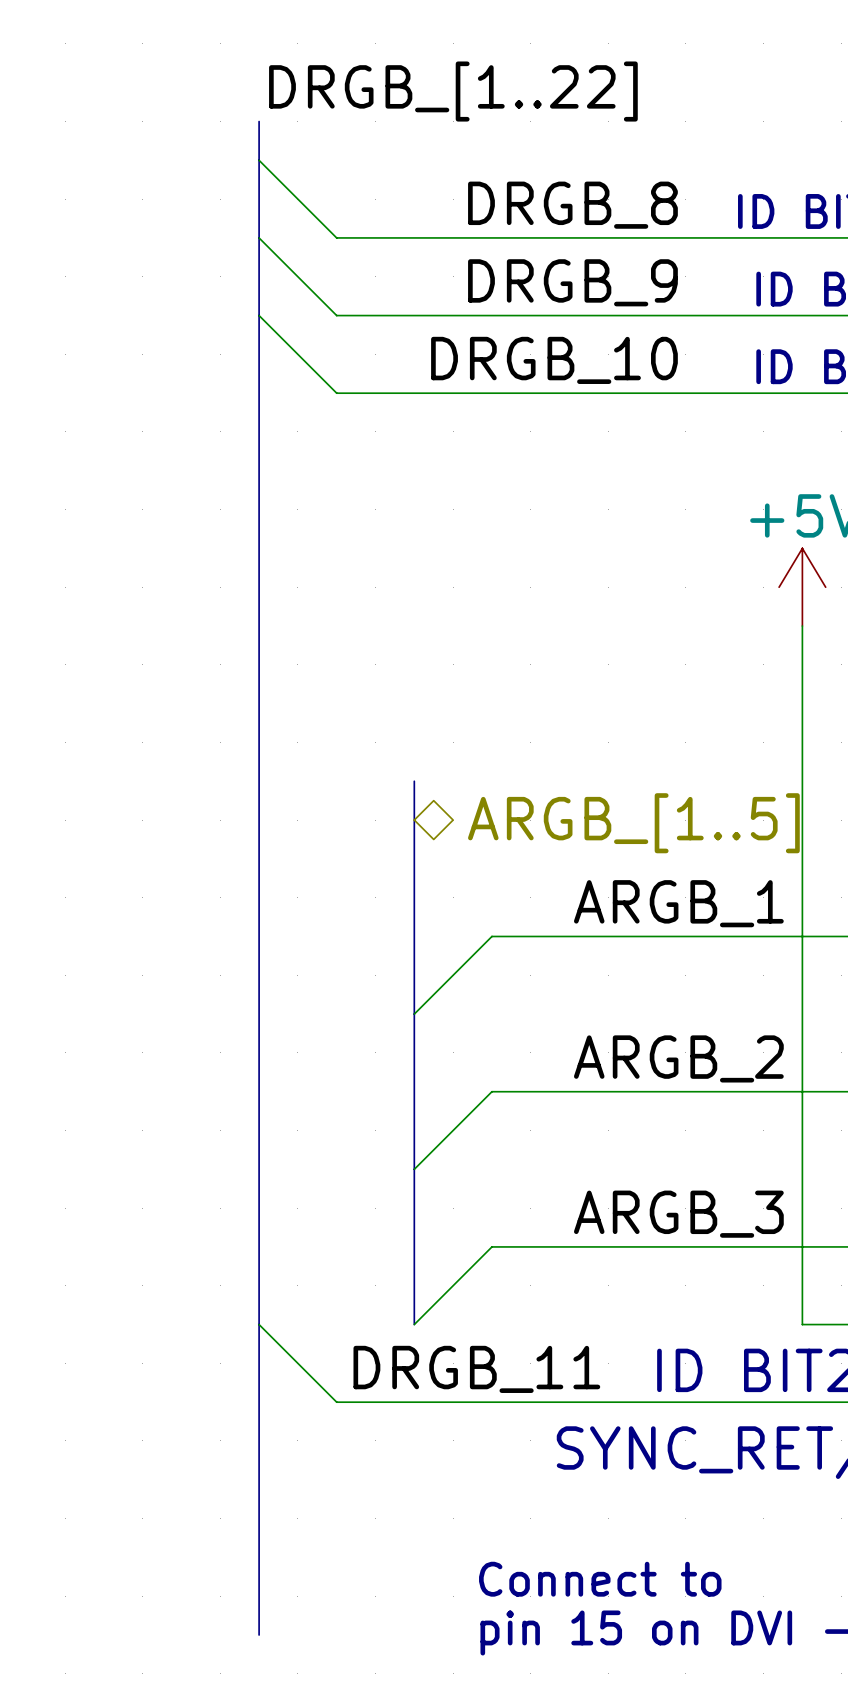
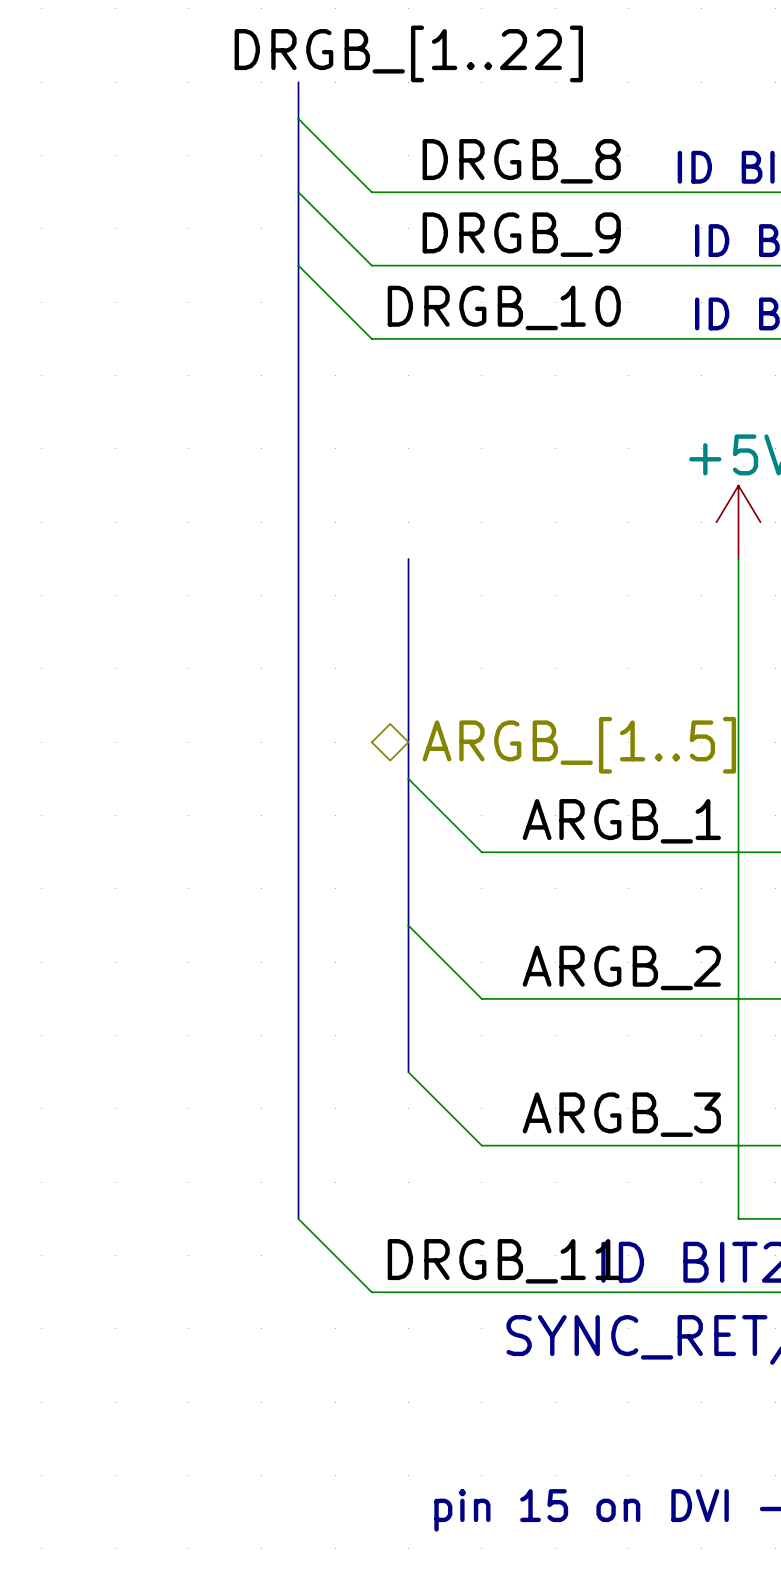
bus: (259, 121) (259, 1635) -> none
bus: none -> (298, 82) (298, 1218)
wire: (259, 160) (336, 237) (414, 237) -> (298, 118) (371, 192)
wire: (259, 237) (336, 315) (414, 315) -> (298, 192) (371, 265)
wire: (259, 315) (336, 393) (414, 393) -> (298, 265) (371, 338)
bus: (414, 781) (414, 1324) -> (408, 558) (408, 1072)
wire: (530, 936) (491, 936) (414, 1014) -> (481, 852) (408, 778)
wire: (530, 1091) (491, 1091) (414, 1169) -> (481, 998) (408, 925)
wire: (530, 1246) (491, 1246) (414, 1324) -> (481, 1145) (408, 1072)
wire: (259, 1324) (336, 1402) (414, 1402) -> (298, 1218) (371, 1292)
label position: DRGB_11 (476, 1369) -> DRGB_11 (504, 1261)
text: Connect to (600, 1579) -> none

